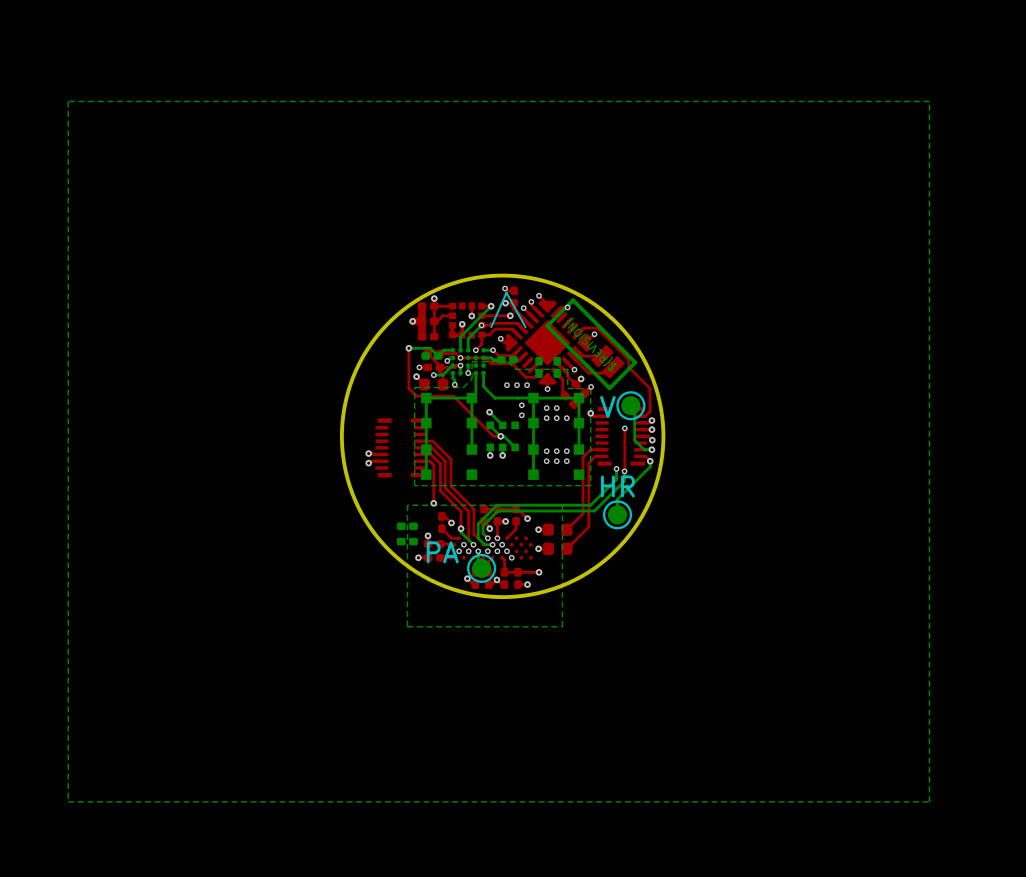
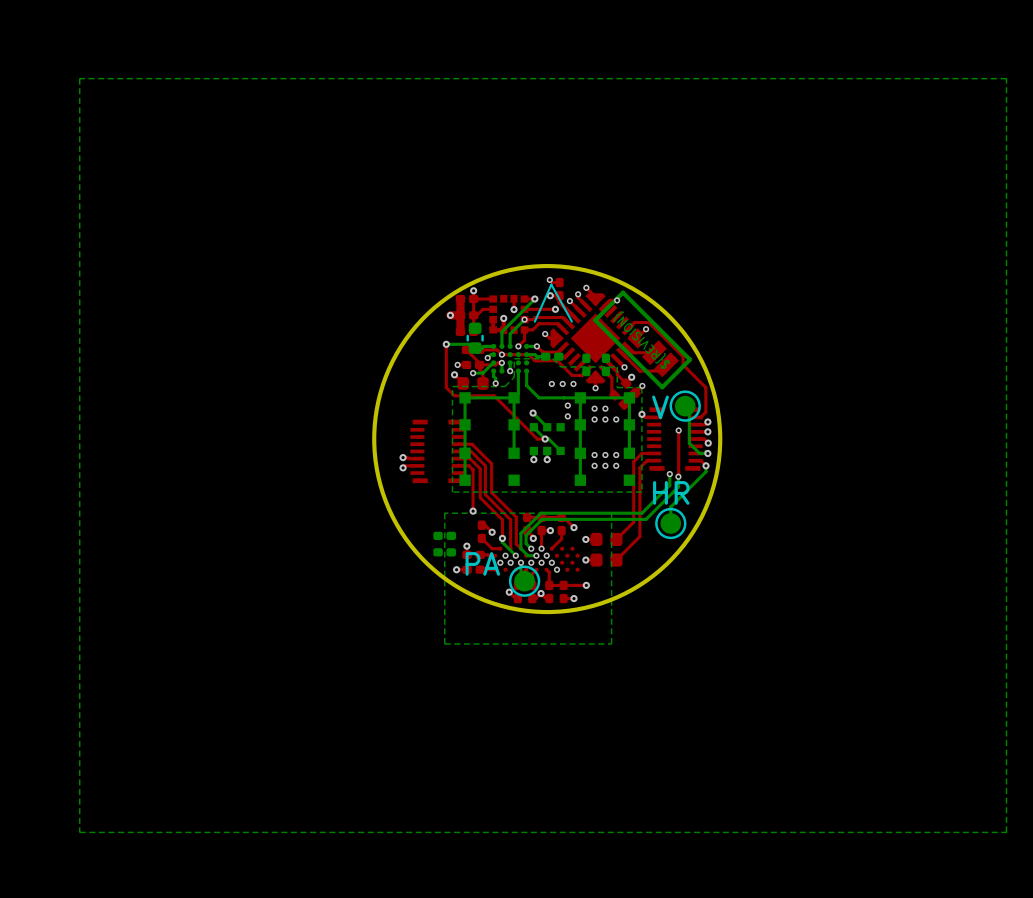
part footprint: [421, 352, 443, 360] -> [466, 322, 484, 354]

